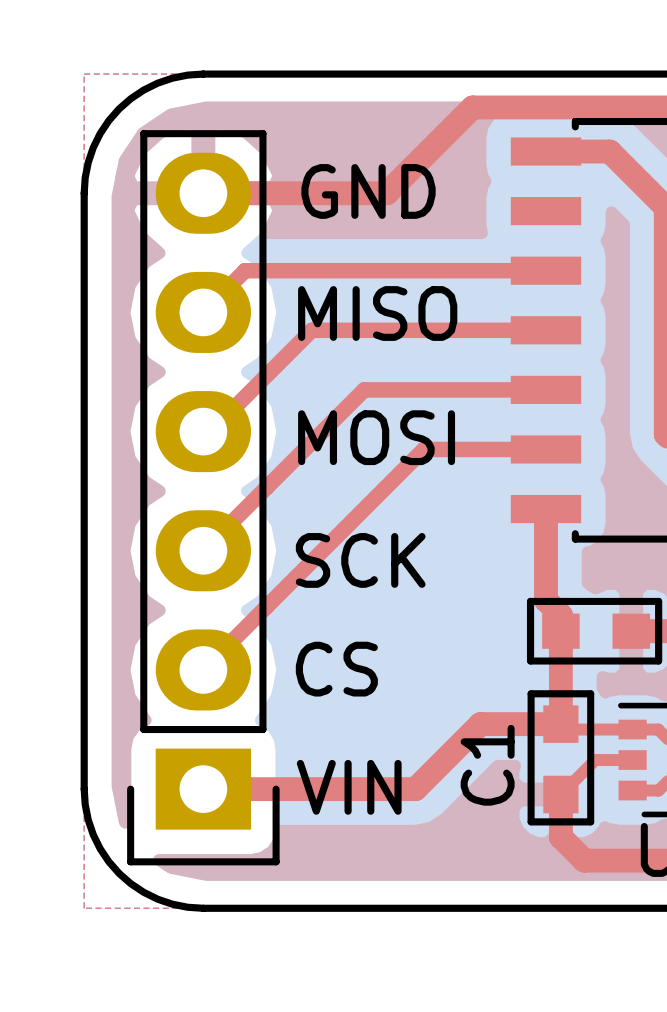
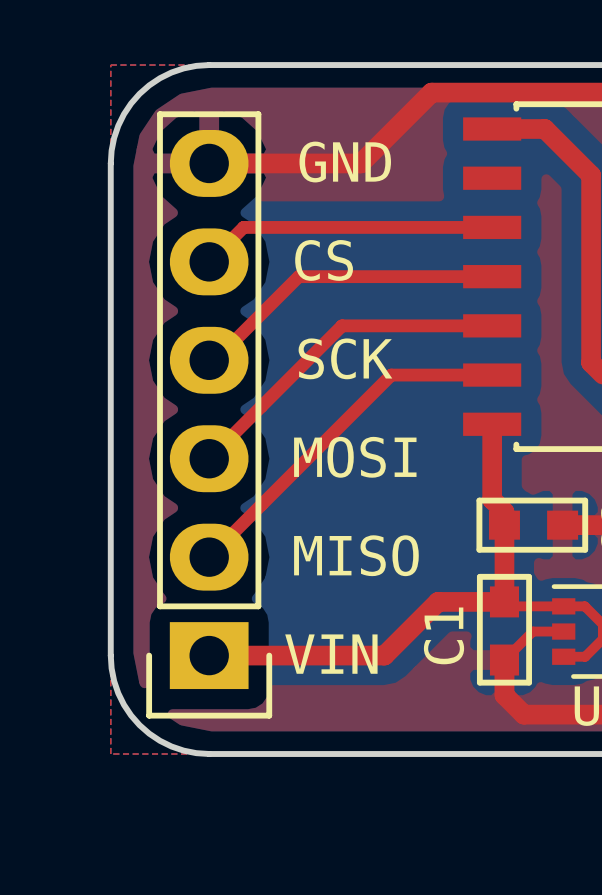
text position: MISO (377, 313) -> MISO (356, 555)
text position: MOSI (376, 437) -> MOSI (355, 457)
text position: SCK (360, 560) -> SCK (345, 358)
text position: CS (336, 669) -> CS (324, 260)

